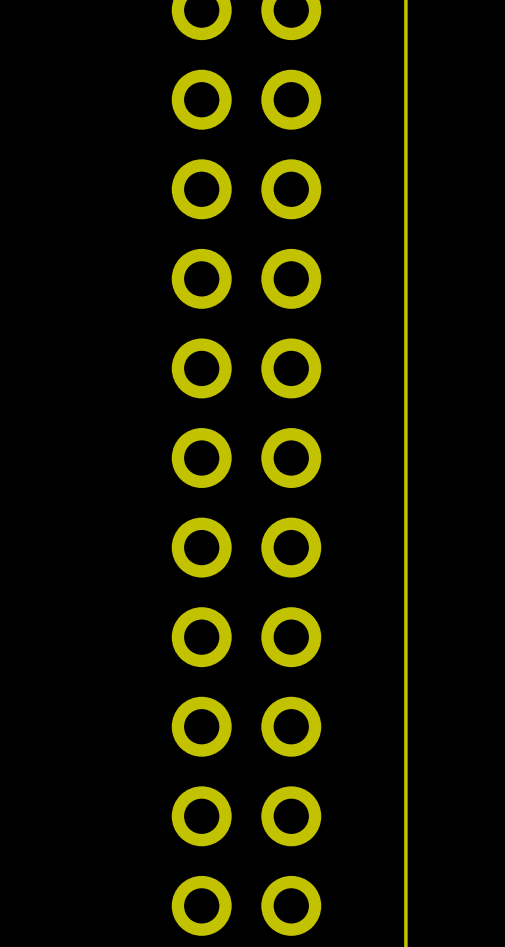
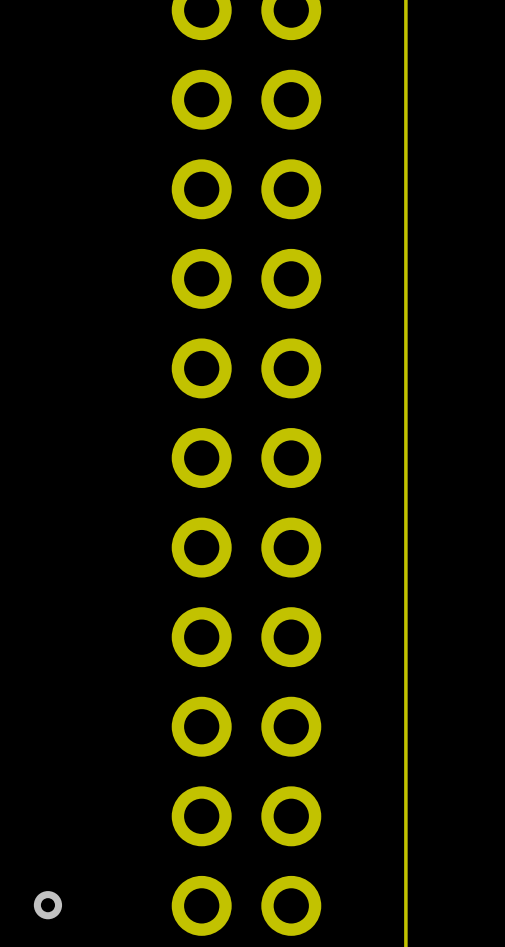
via: none -> (47, 905)

